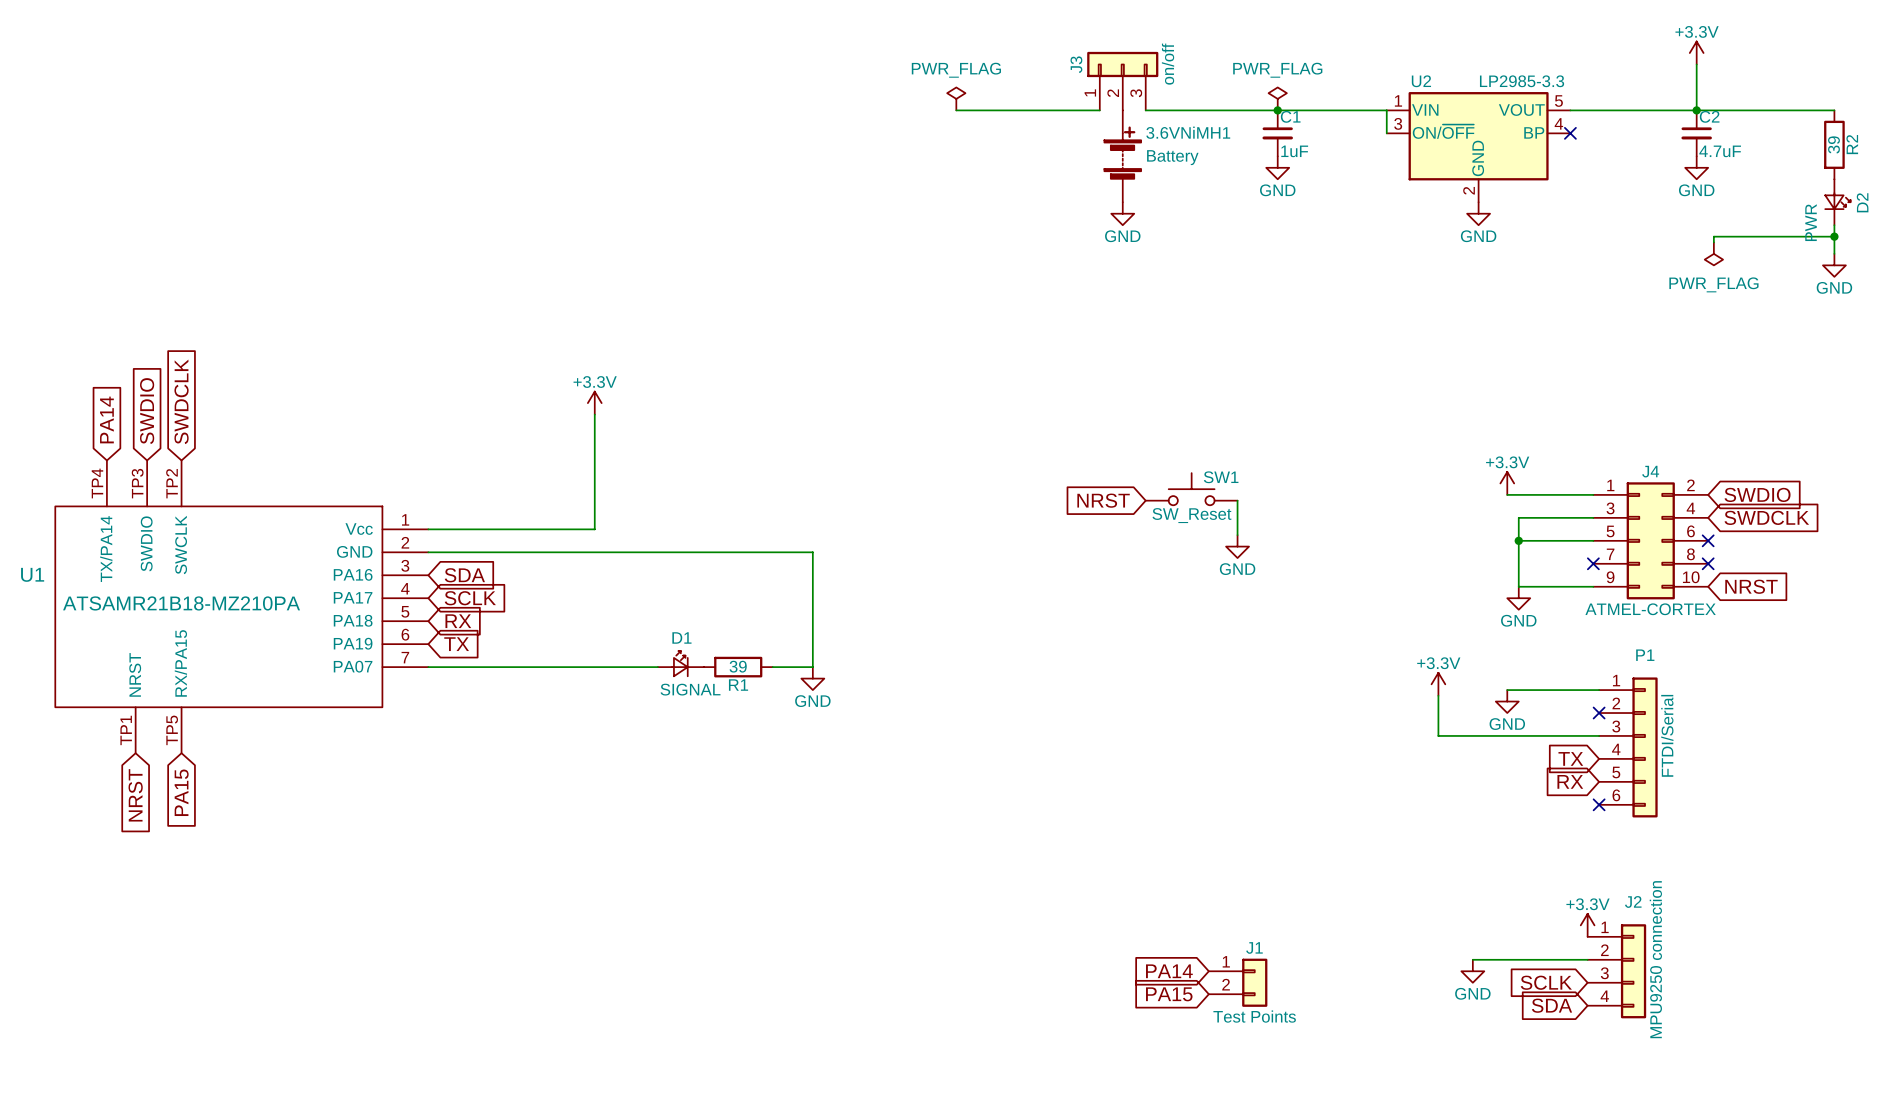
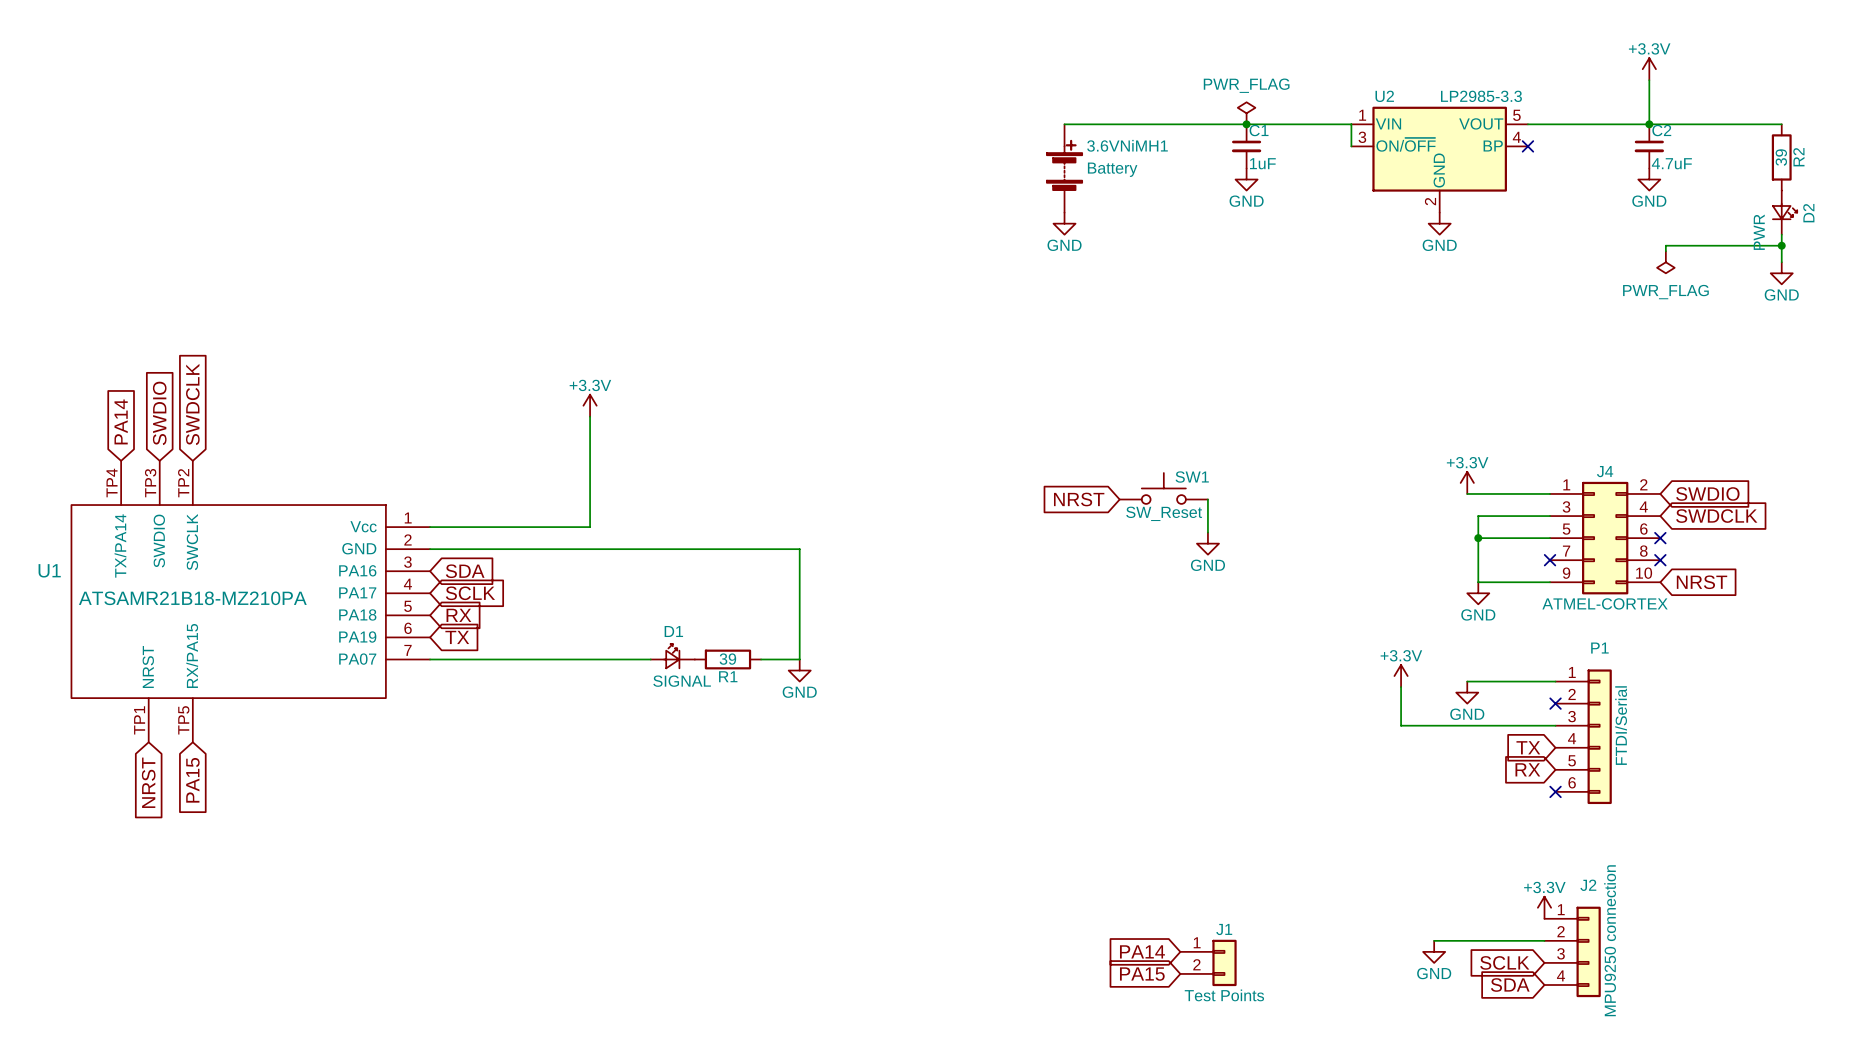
J3: on/off (1122, 81) -> none
power symbol: PWR_FLAG (956, 98) -> none
wire: (956, 110) (1088, 110) -> none
wire: none -> (1075, 124) (1119, 124)
3.6VNiMH1 position: (1122, 156) -> (1064, 168)
power symbol position: GND (1122, 213) -> GND (1064, 223)

